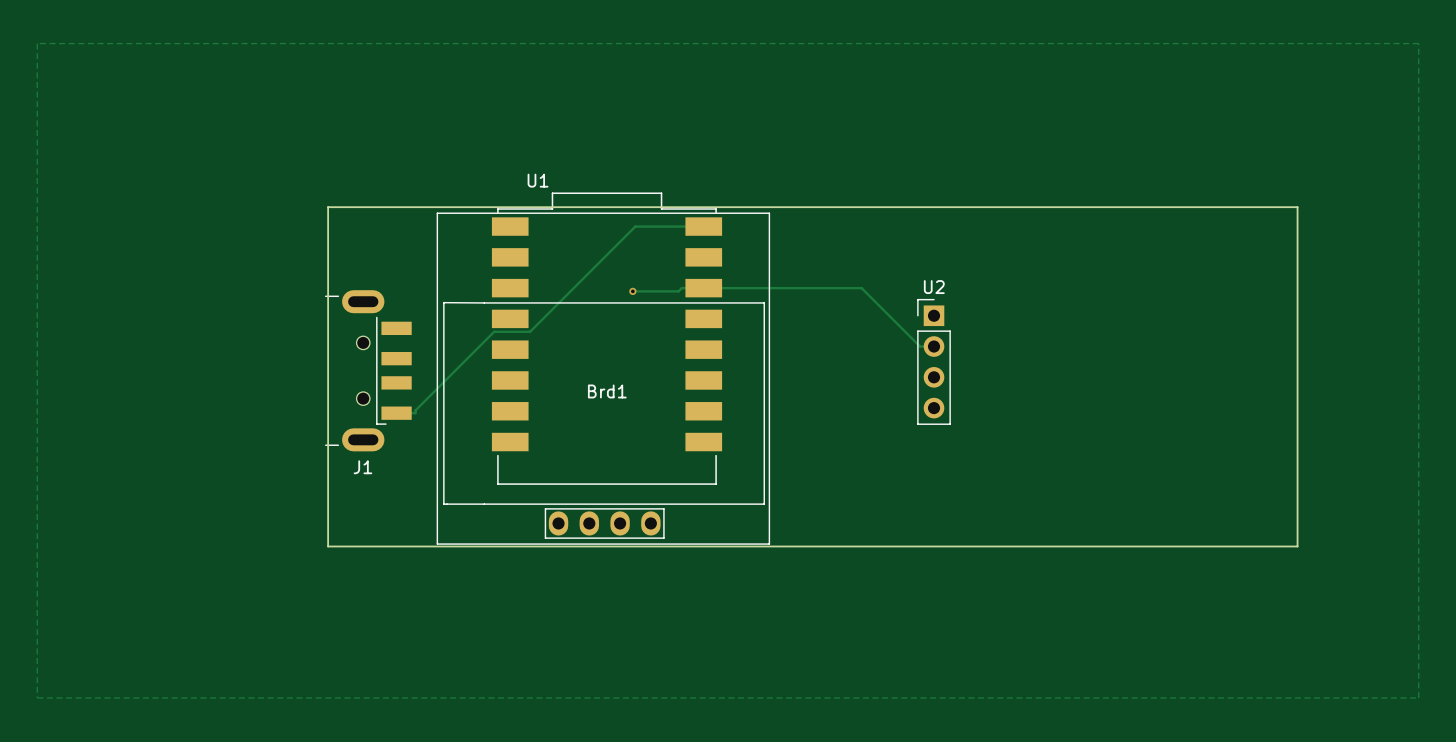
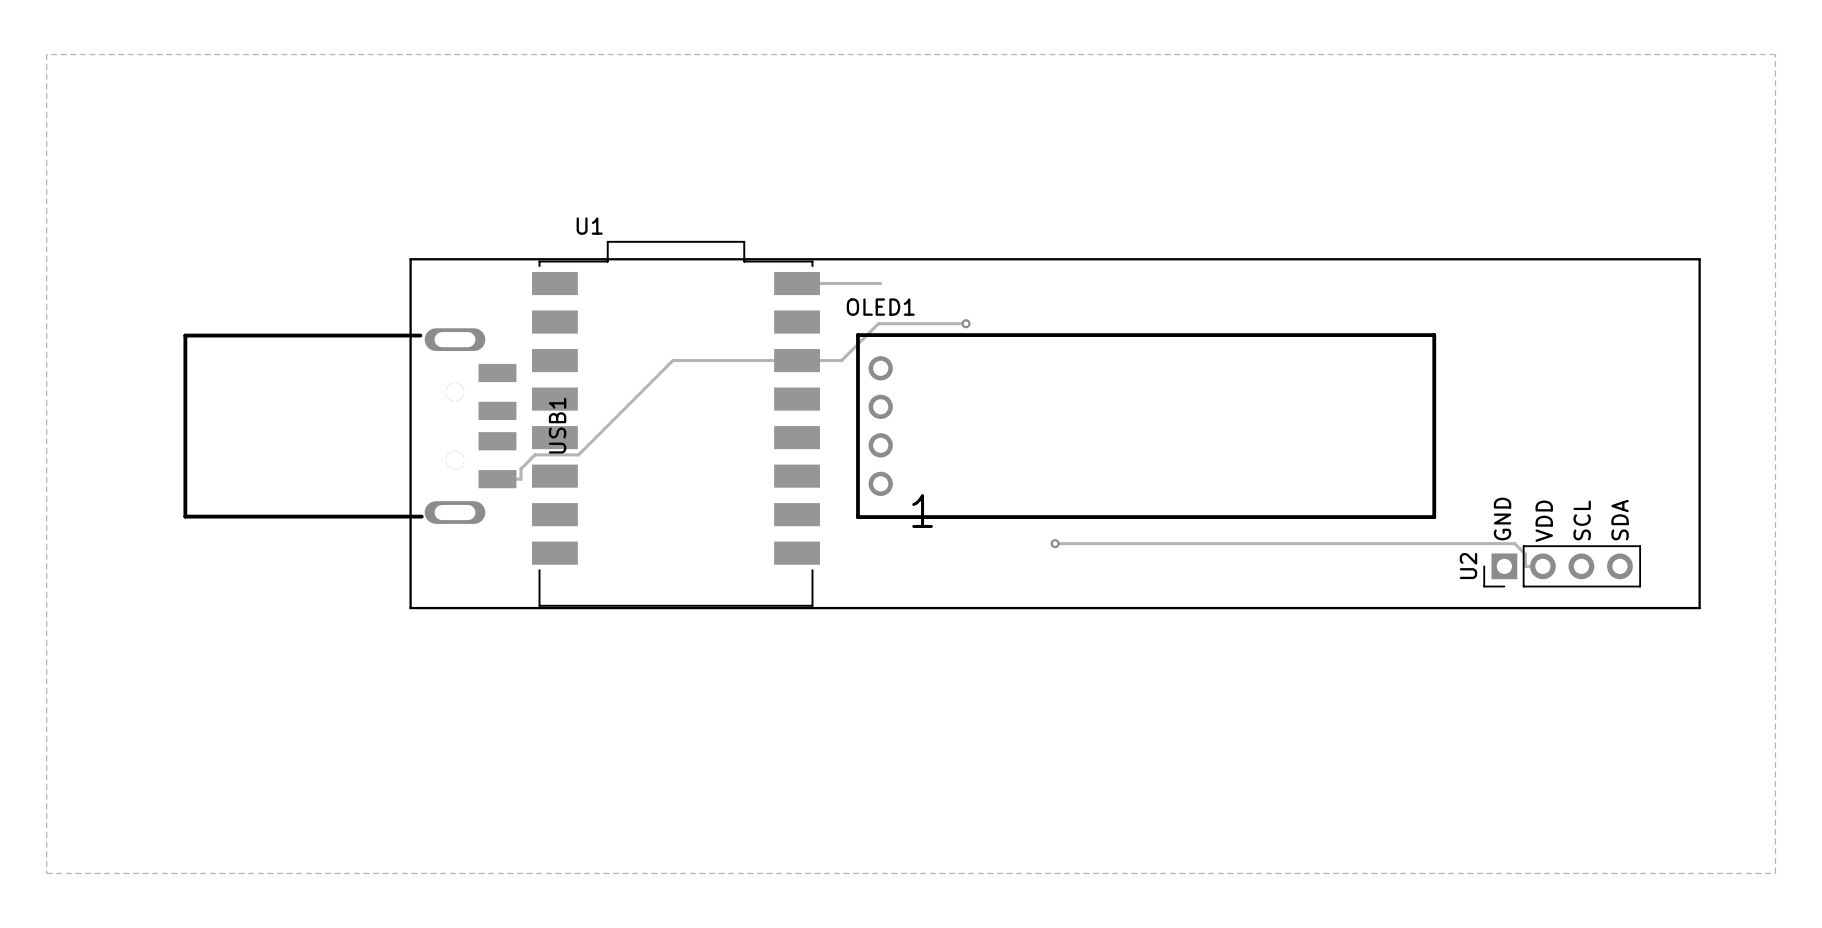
board edge: (1297, 207) (1297, 546) (328, 546) (328, 485) -> (1623, 259) (1699, 259) (1699, 608) (410, 608)
track: (636, 226) (530, 331) (494, 331) (415, 410) (415, 413) (396, 413) -> none
track: none -> (966, 323) (878, 323) (841, 360) (672, 360) (578, 454) (535, 454) (520, 468) (520, 479) (497, 479)
via: none -> (966, 323)
U2 name position: U2 (934, 287) -> U2 (1468, 566)
track: (632, 291) (678, 291) (681, 288) (861, 288) (920, 346) (934, 346) -> none
via: (632, 291) -> none
U2 footprint: [917, 298, 951, 425] -> [1483, 545, 1642, 588]
U1 position: (607, 338) -> (675, 423)
USB1: none -> (349, 426)
OLED1: none -> (1146, 426)
J1: (368, 370) -> none
Brd1: (603, 378) -> none
track: none -> (1055, 543) (1514, 543) (1525, 554) (1525, 566) (1542, 566)
via: none -> (1055, 543)

